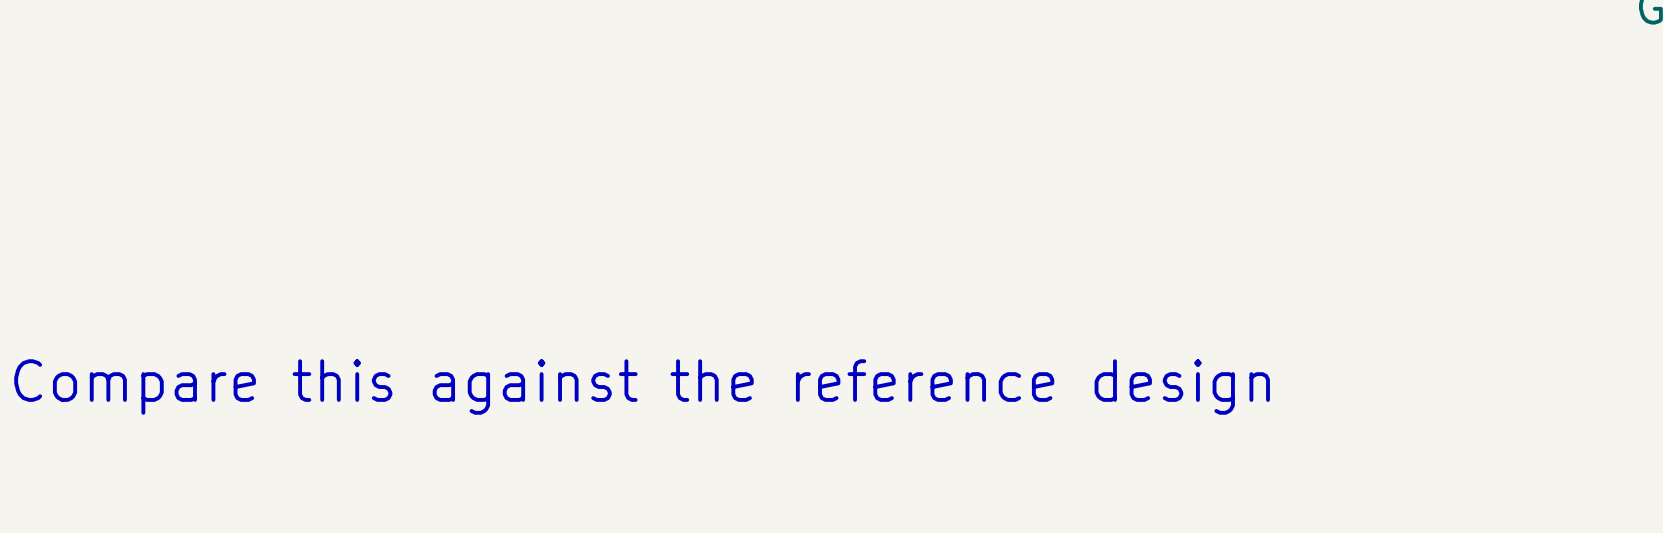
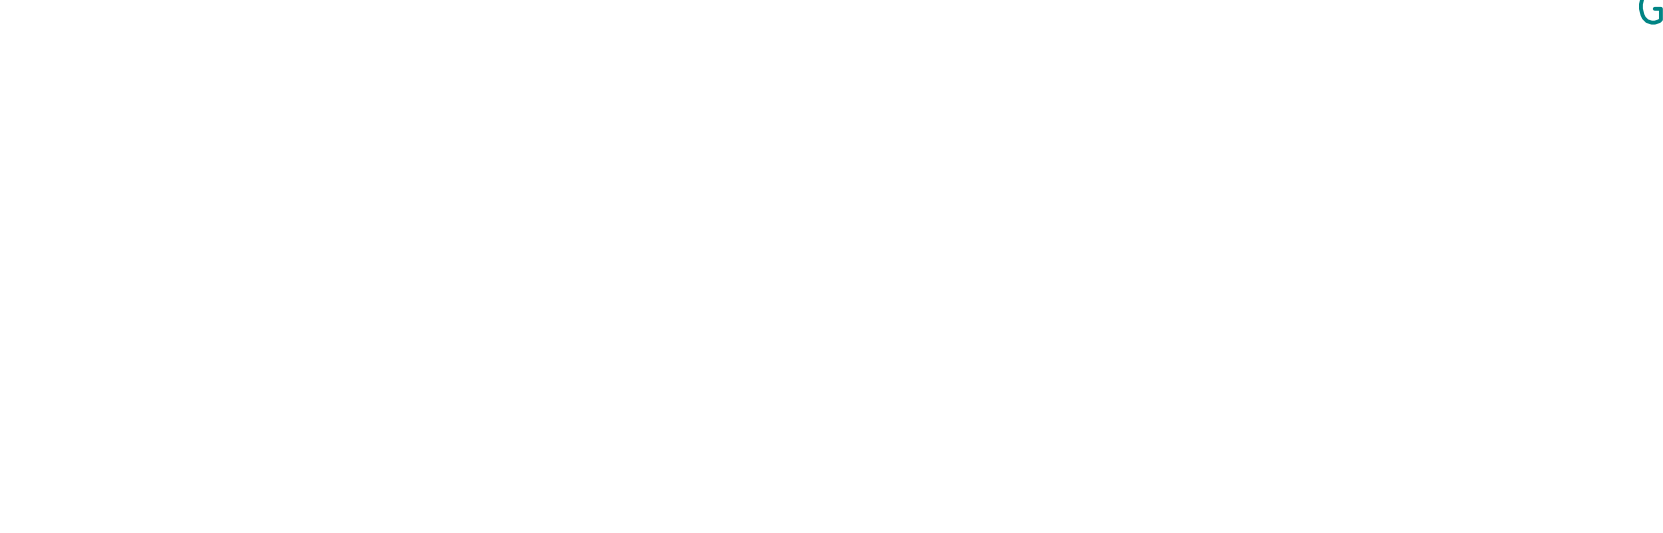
text: Compare this against the reference design (642, 387) -> none

